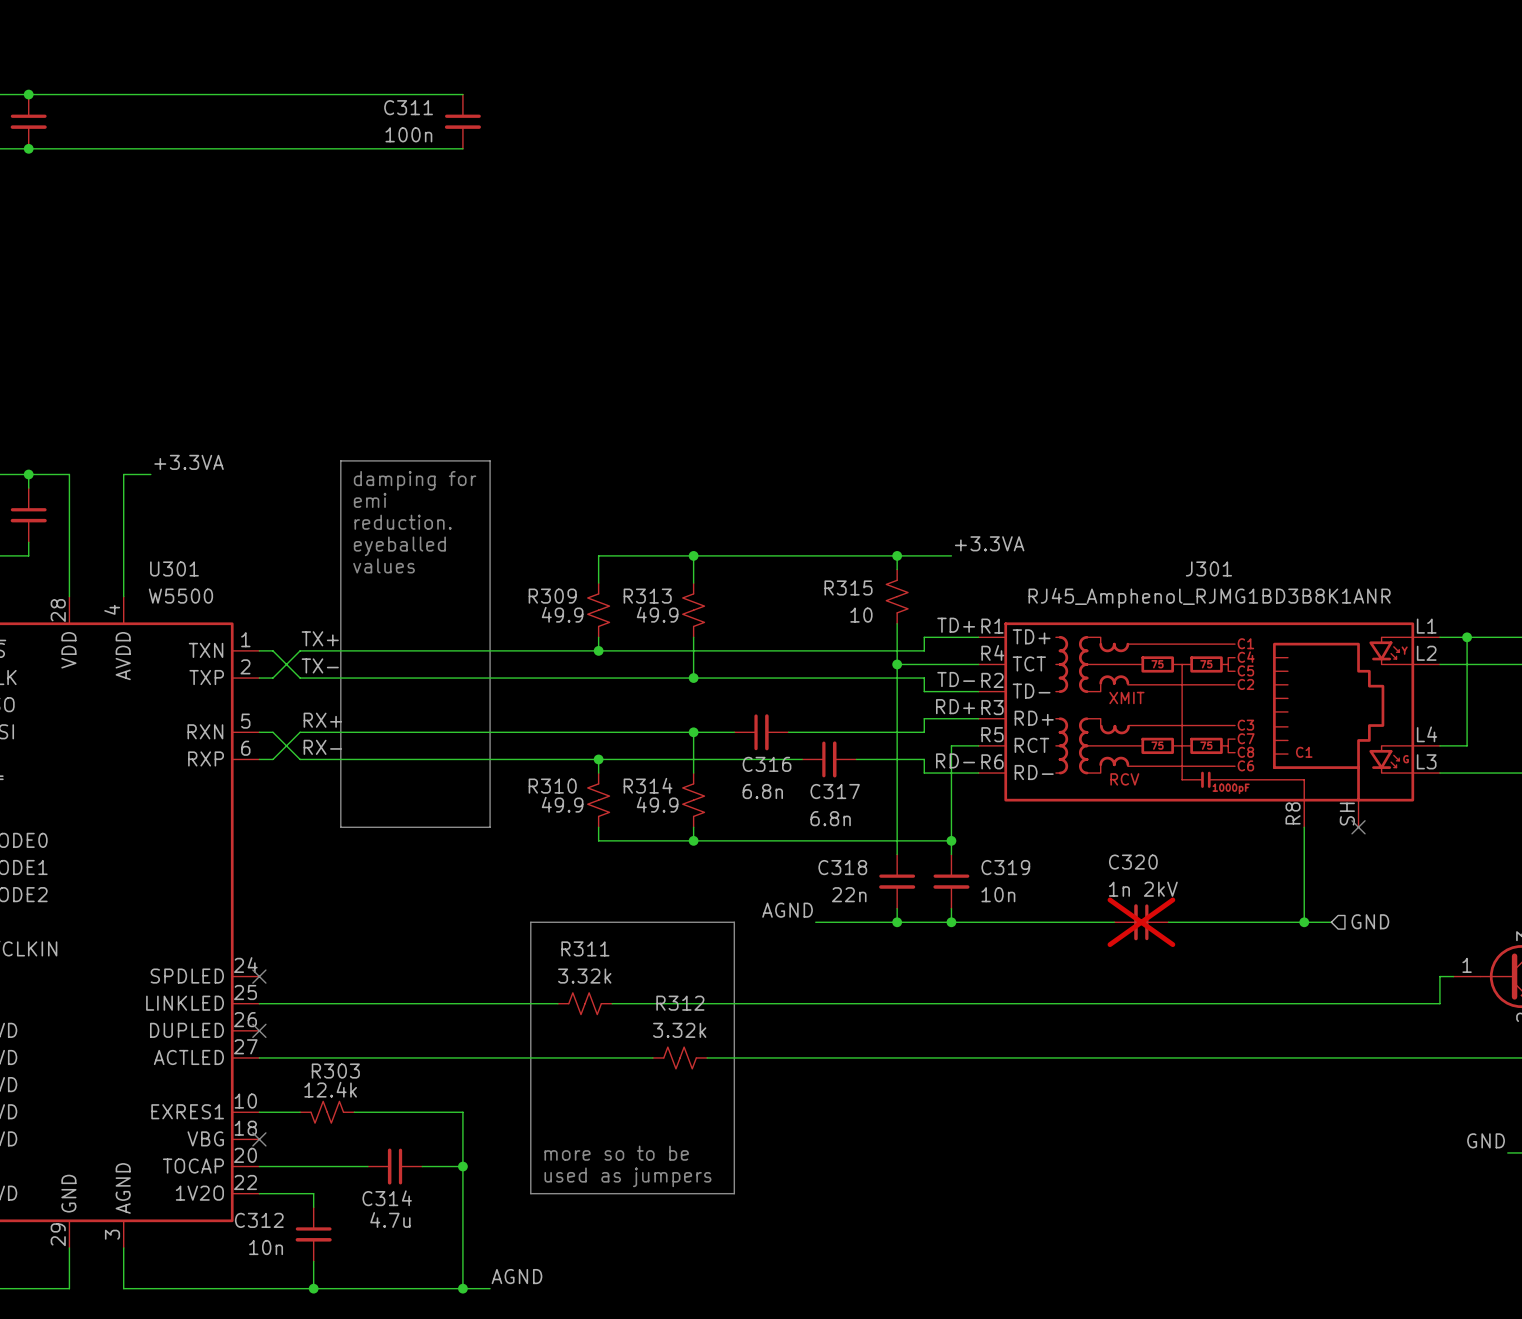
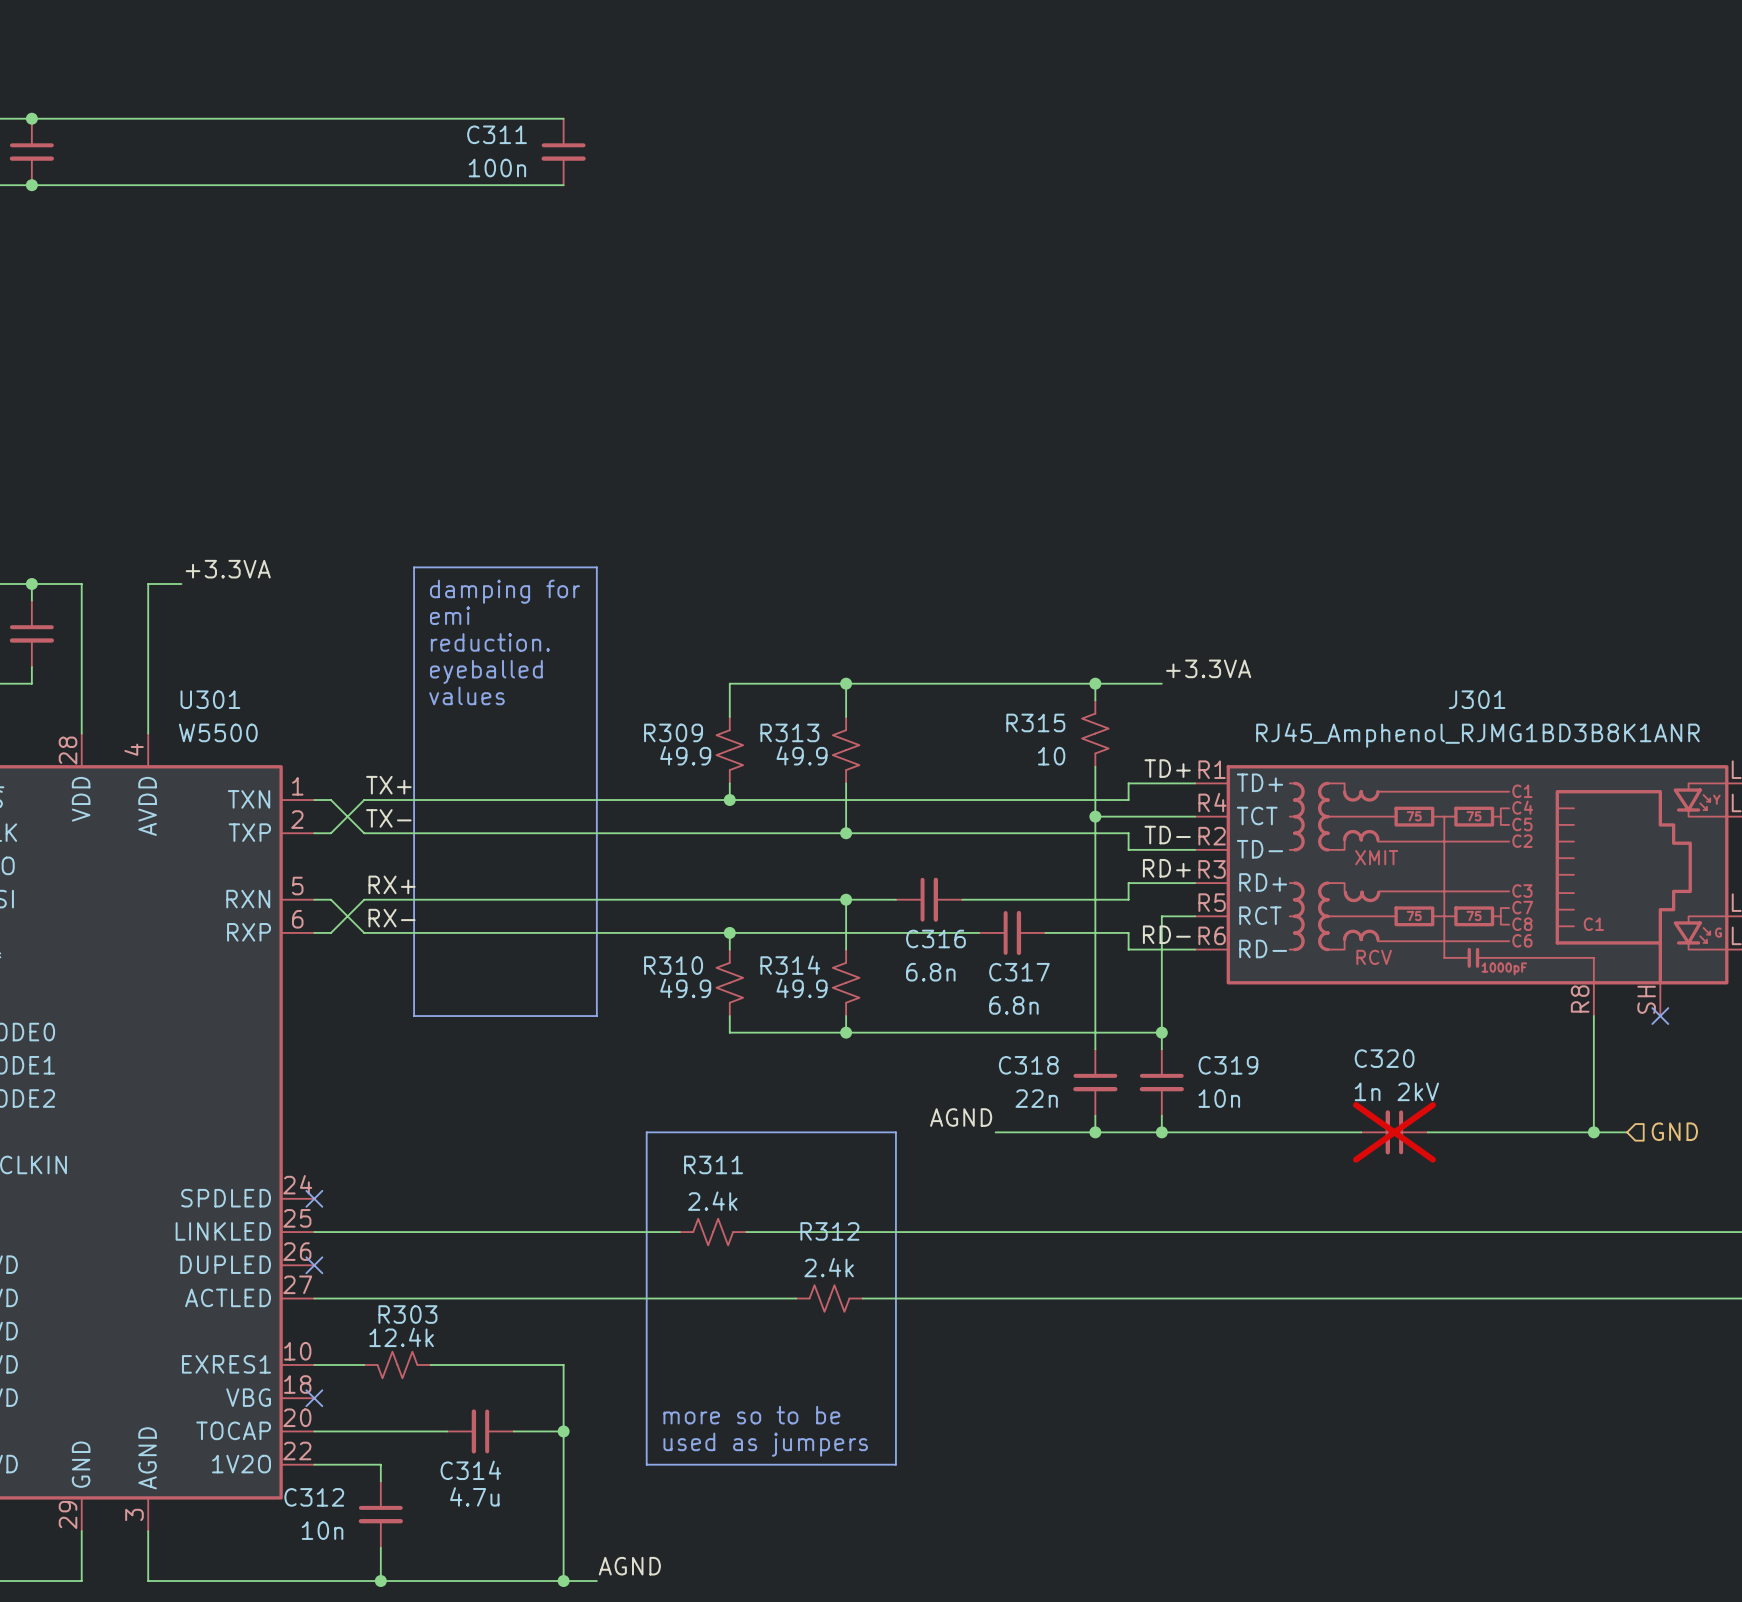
R311 value: 3.32k (584, 976) -> 2.4k (712, 1201)
R312 value: 3.32k (679, 1030) -> 2.4k (829, 1267)

